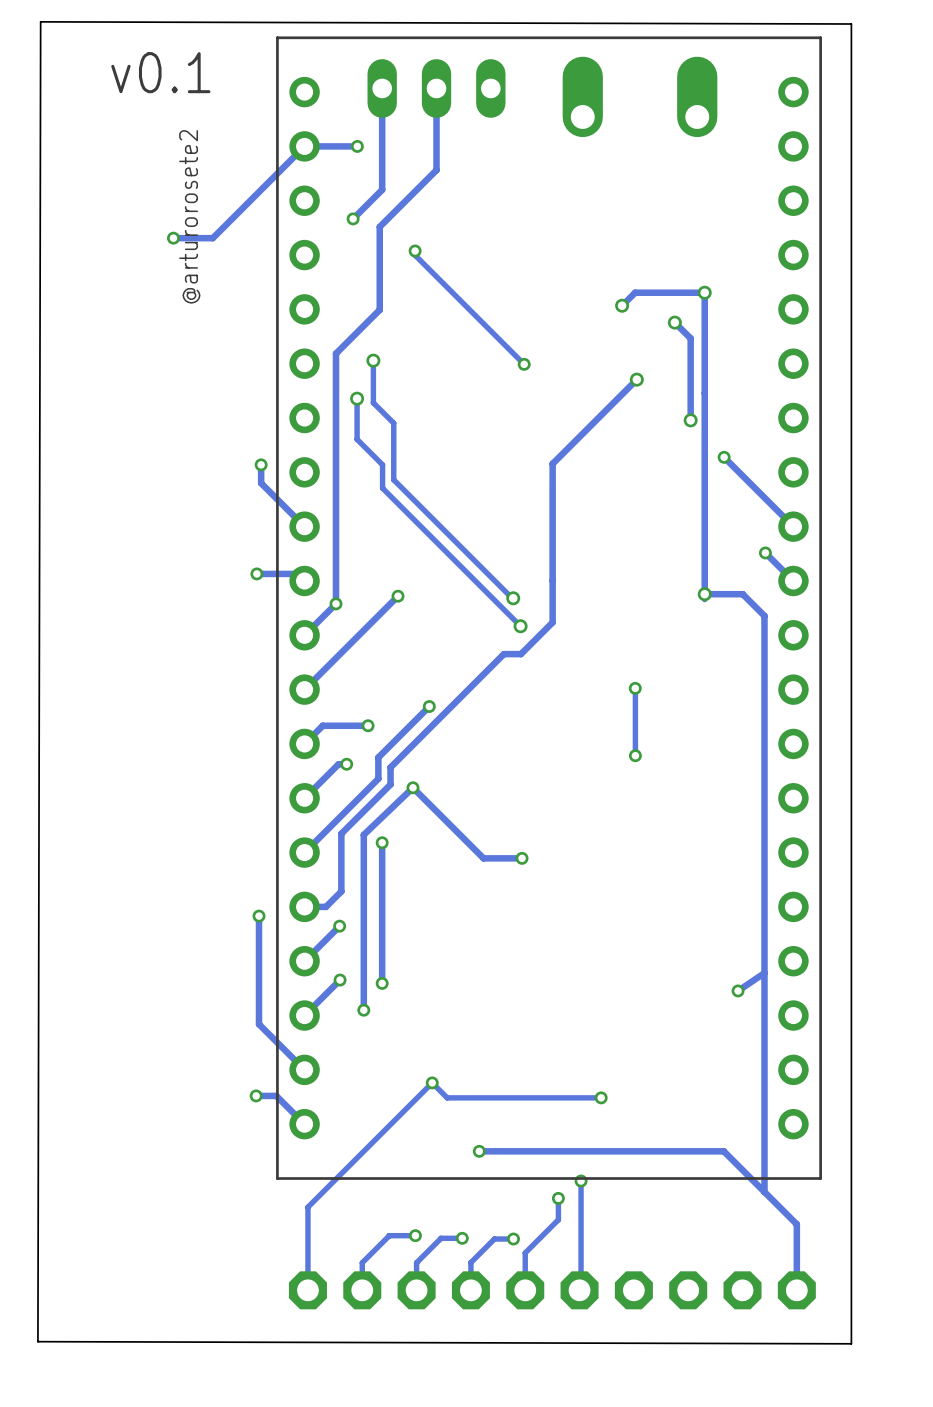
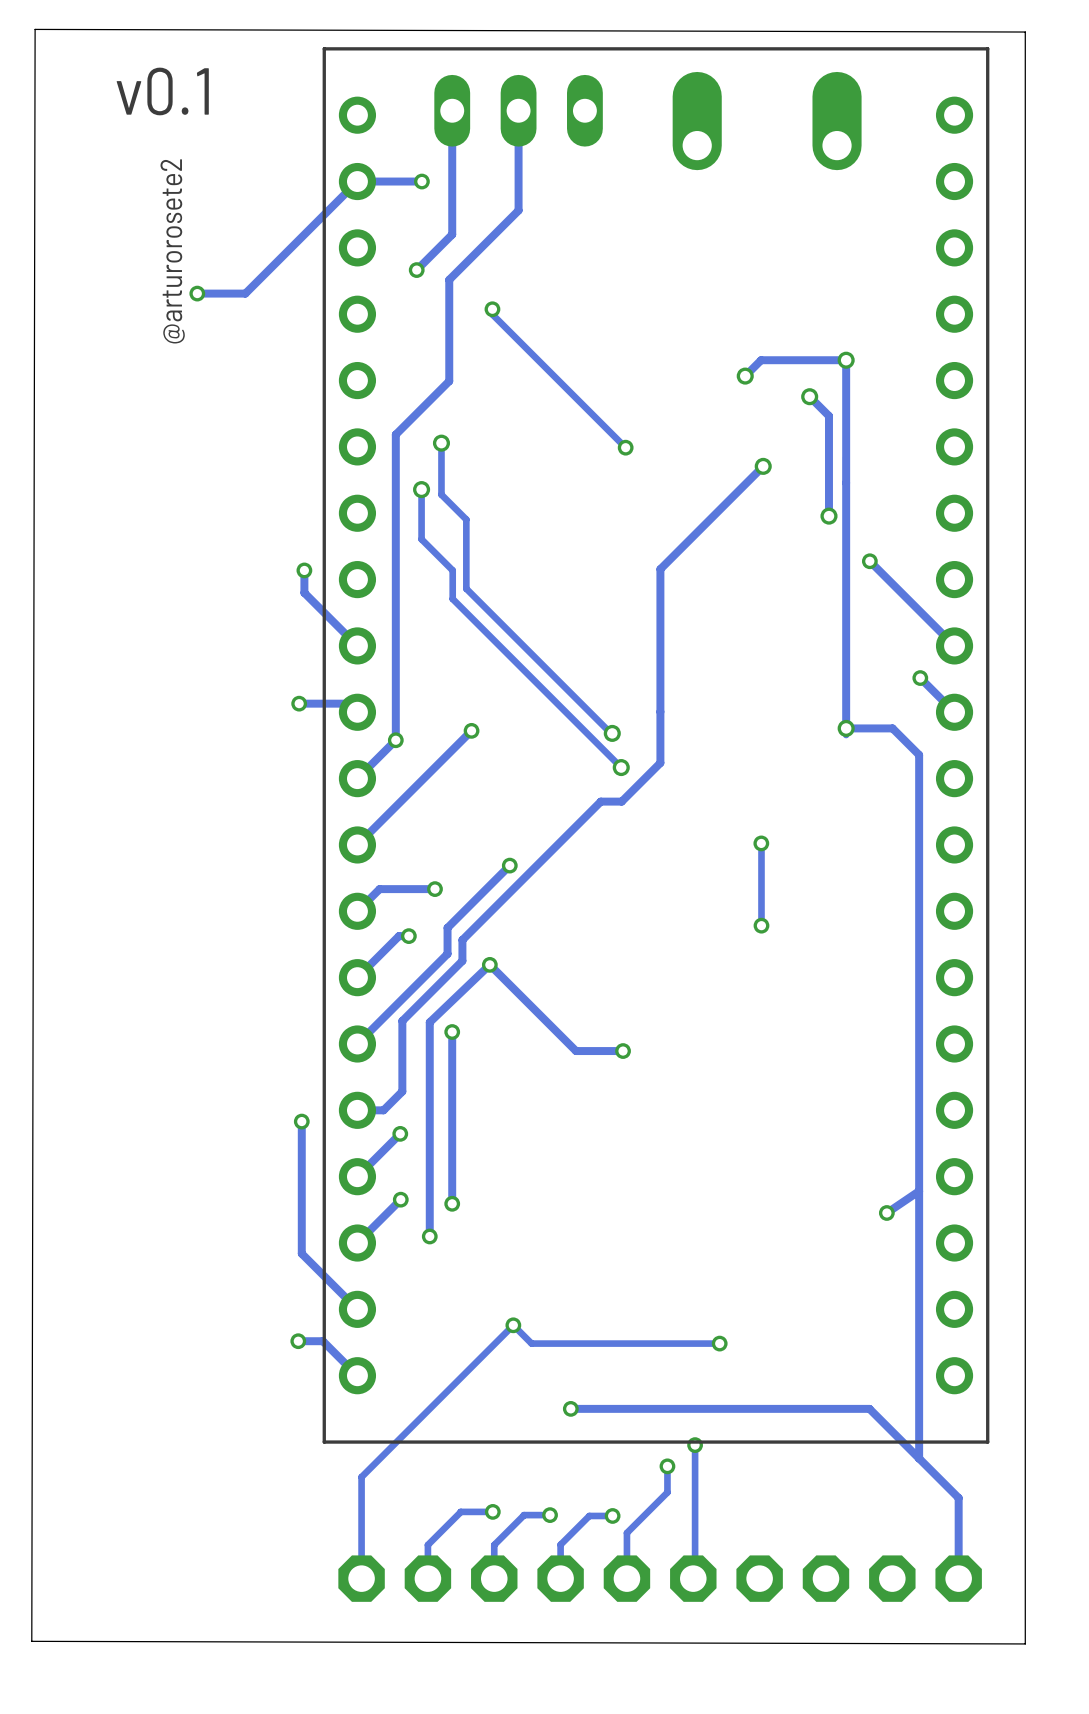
text position: @arturorosete2 (189, 216) -> @arturorosete2 (172, 251)

